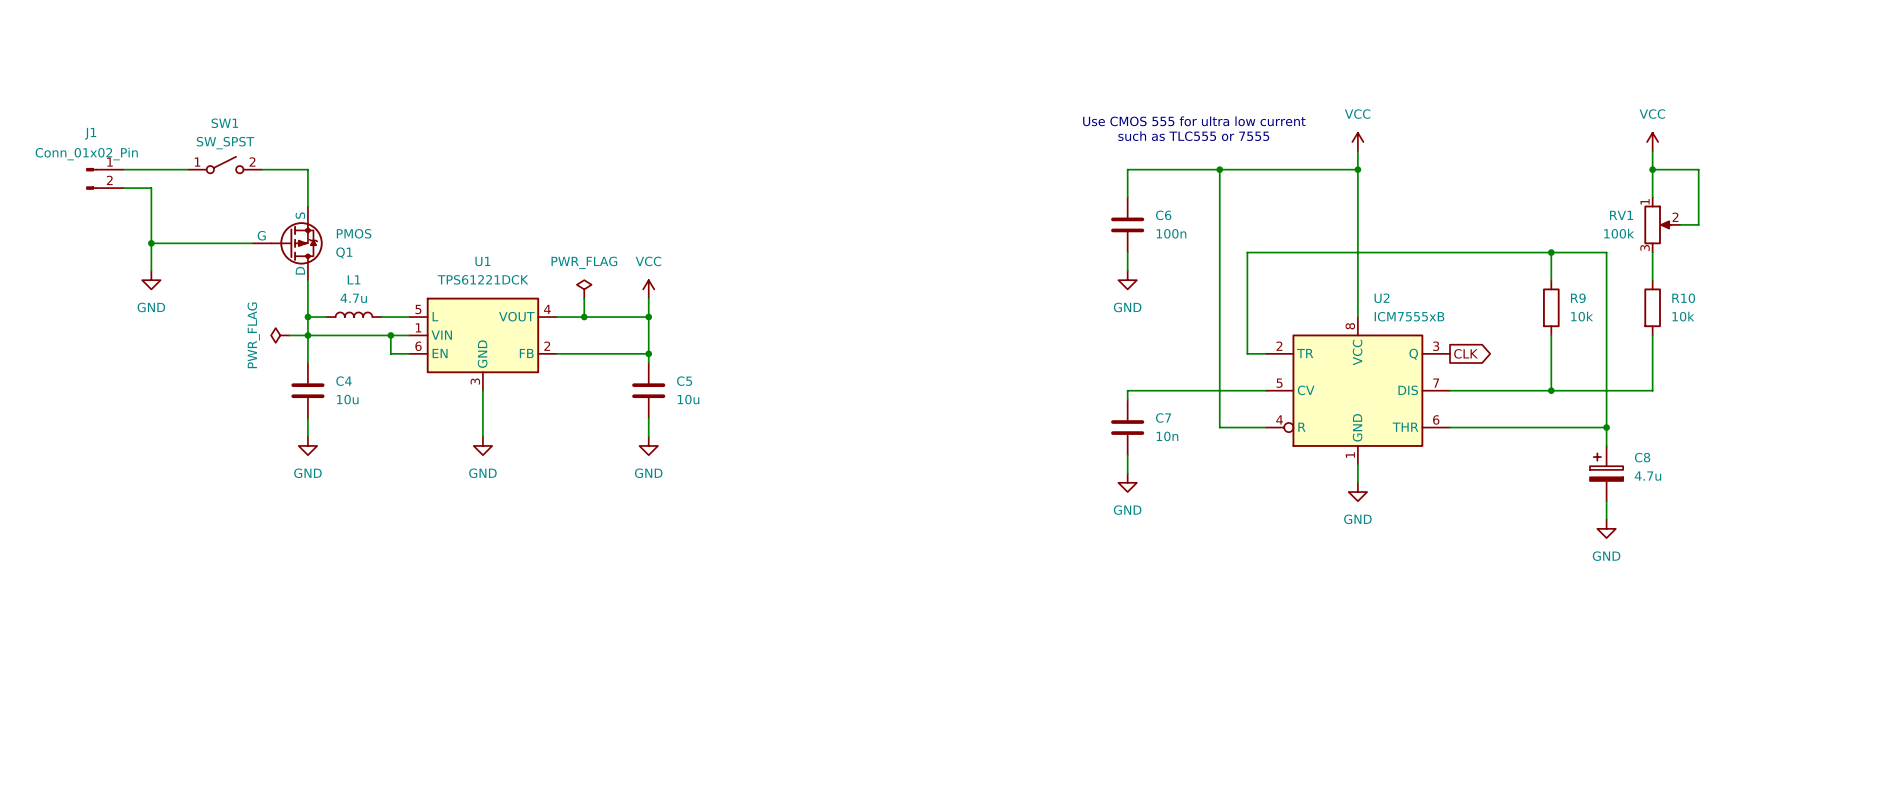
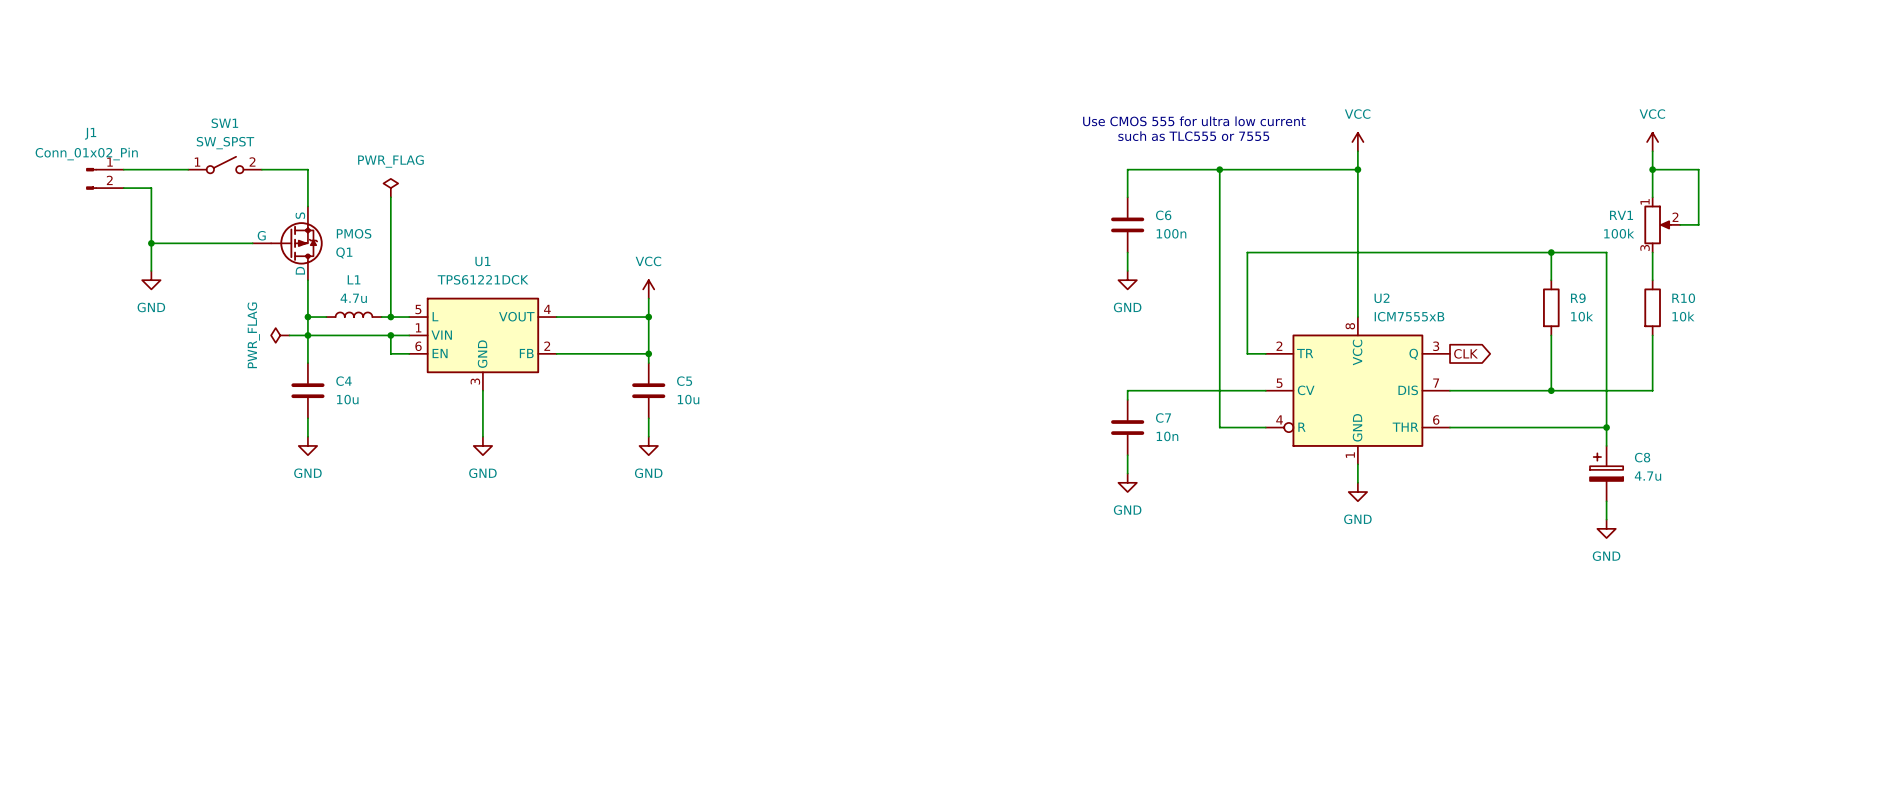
power symbol: none -> PWR_FLAG (390, 188)
wire: none -> (390, 197) (390, 317)
power symbol: PWR_FLAG (584, 289) -> none
wire: (584, 298) (584, 317) -> none
junction: none -> (390, 317)
junction: (584, 317) -> none

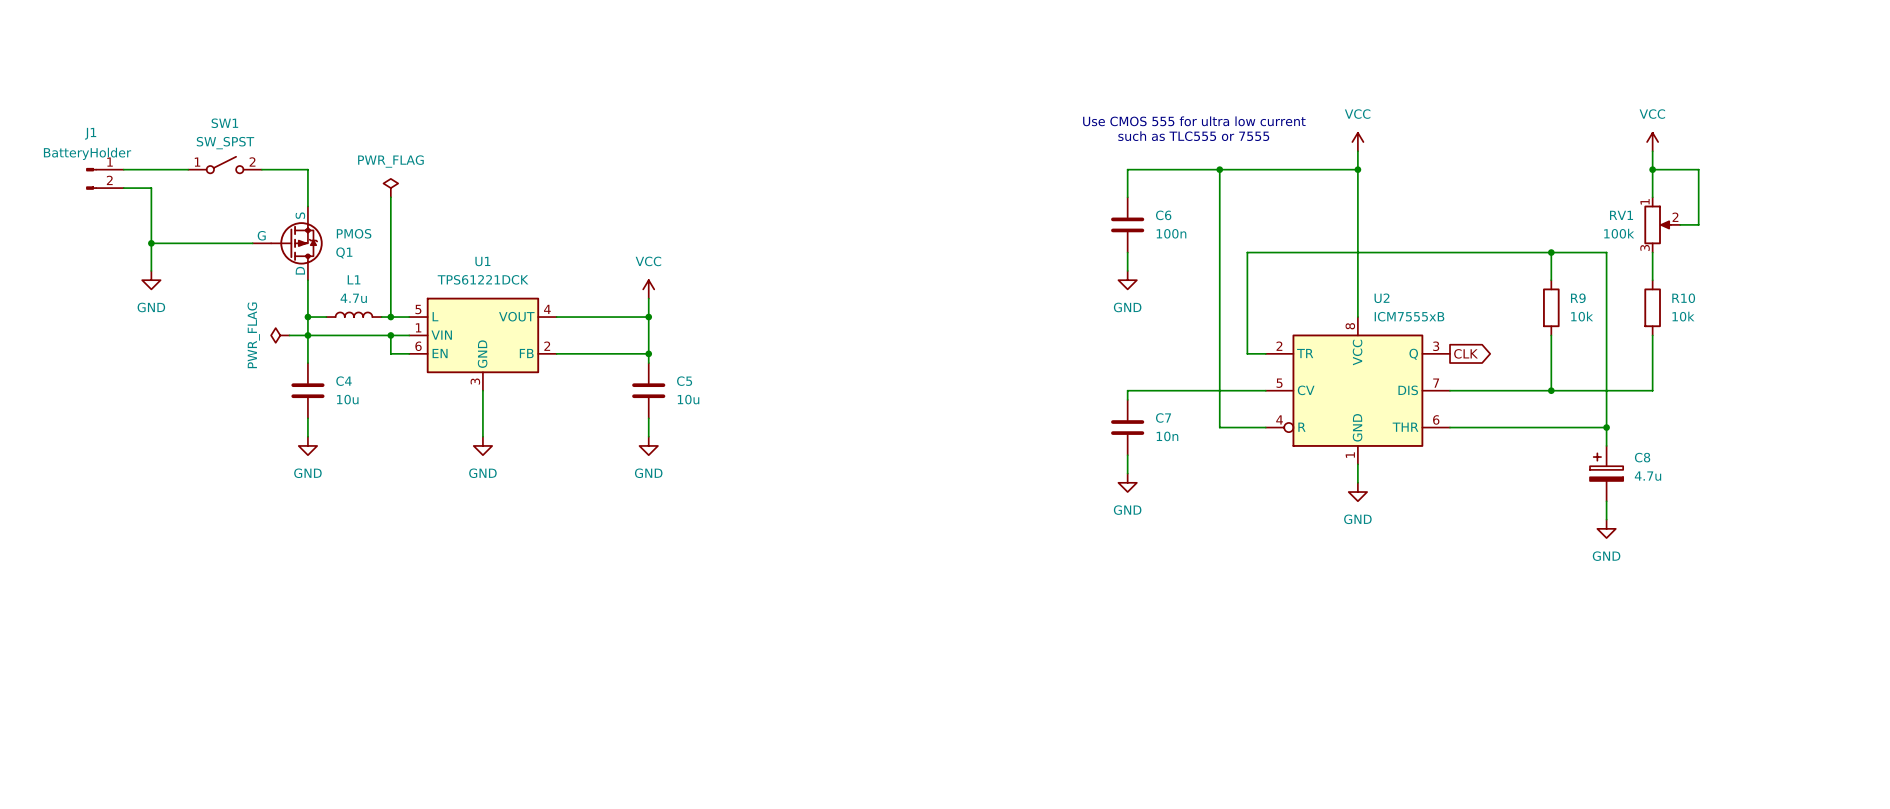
J1 value: Conn_01x02_Pin (86, 154) -> BatteryHolder (87, 153)

